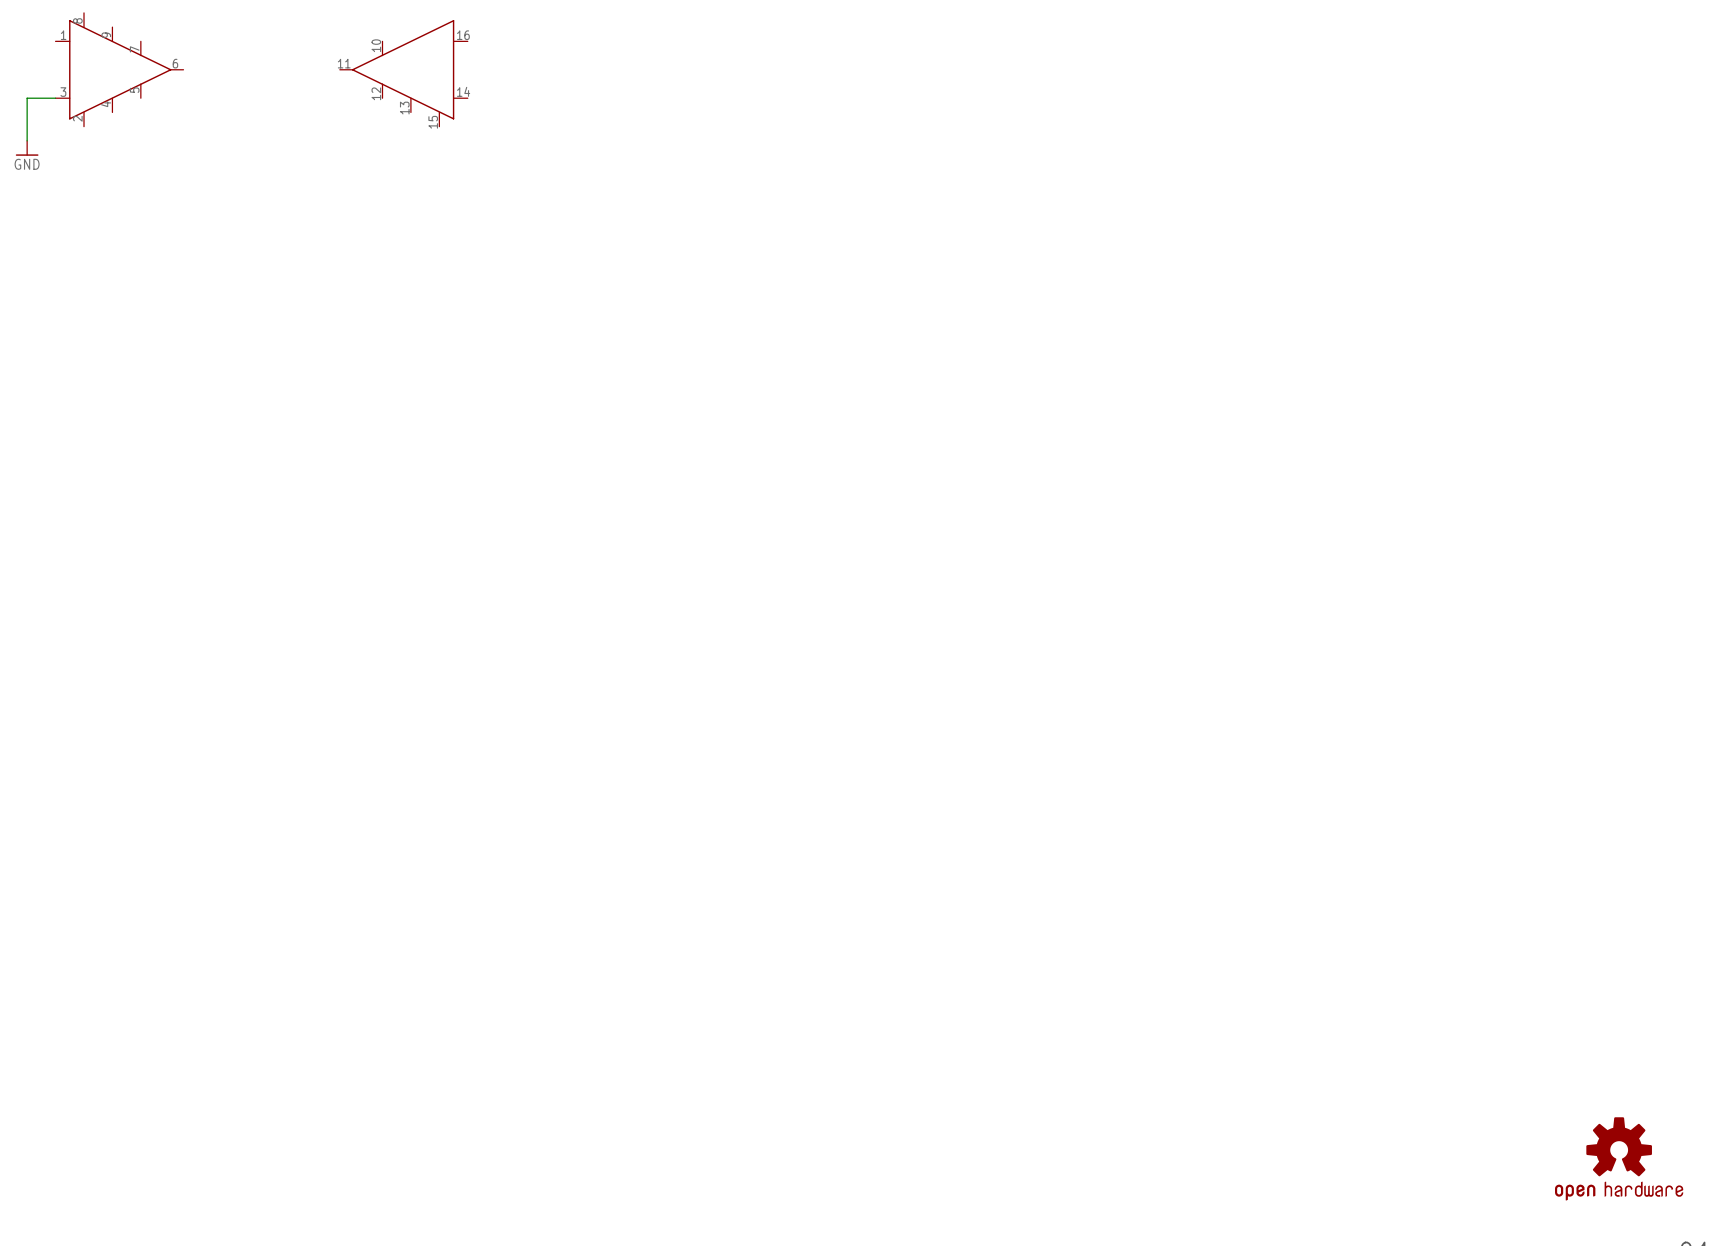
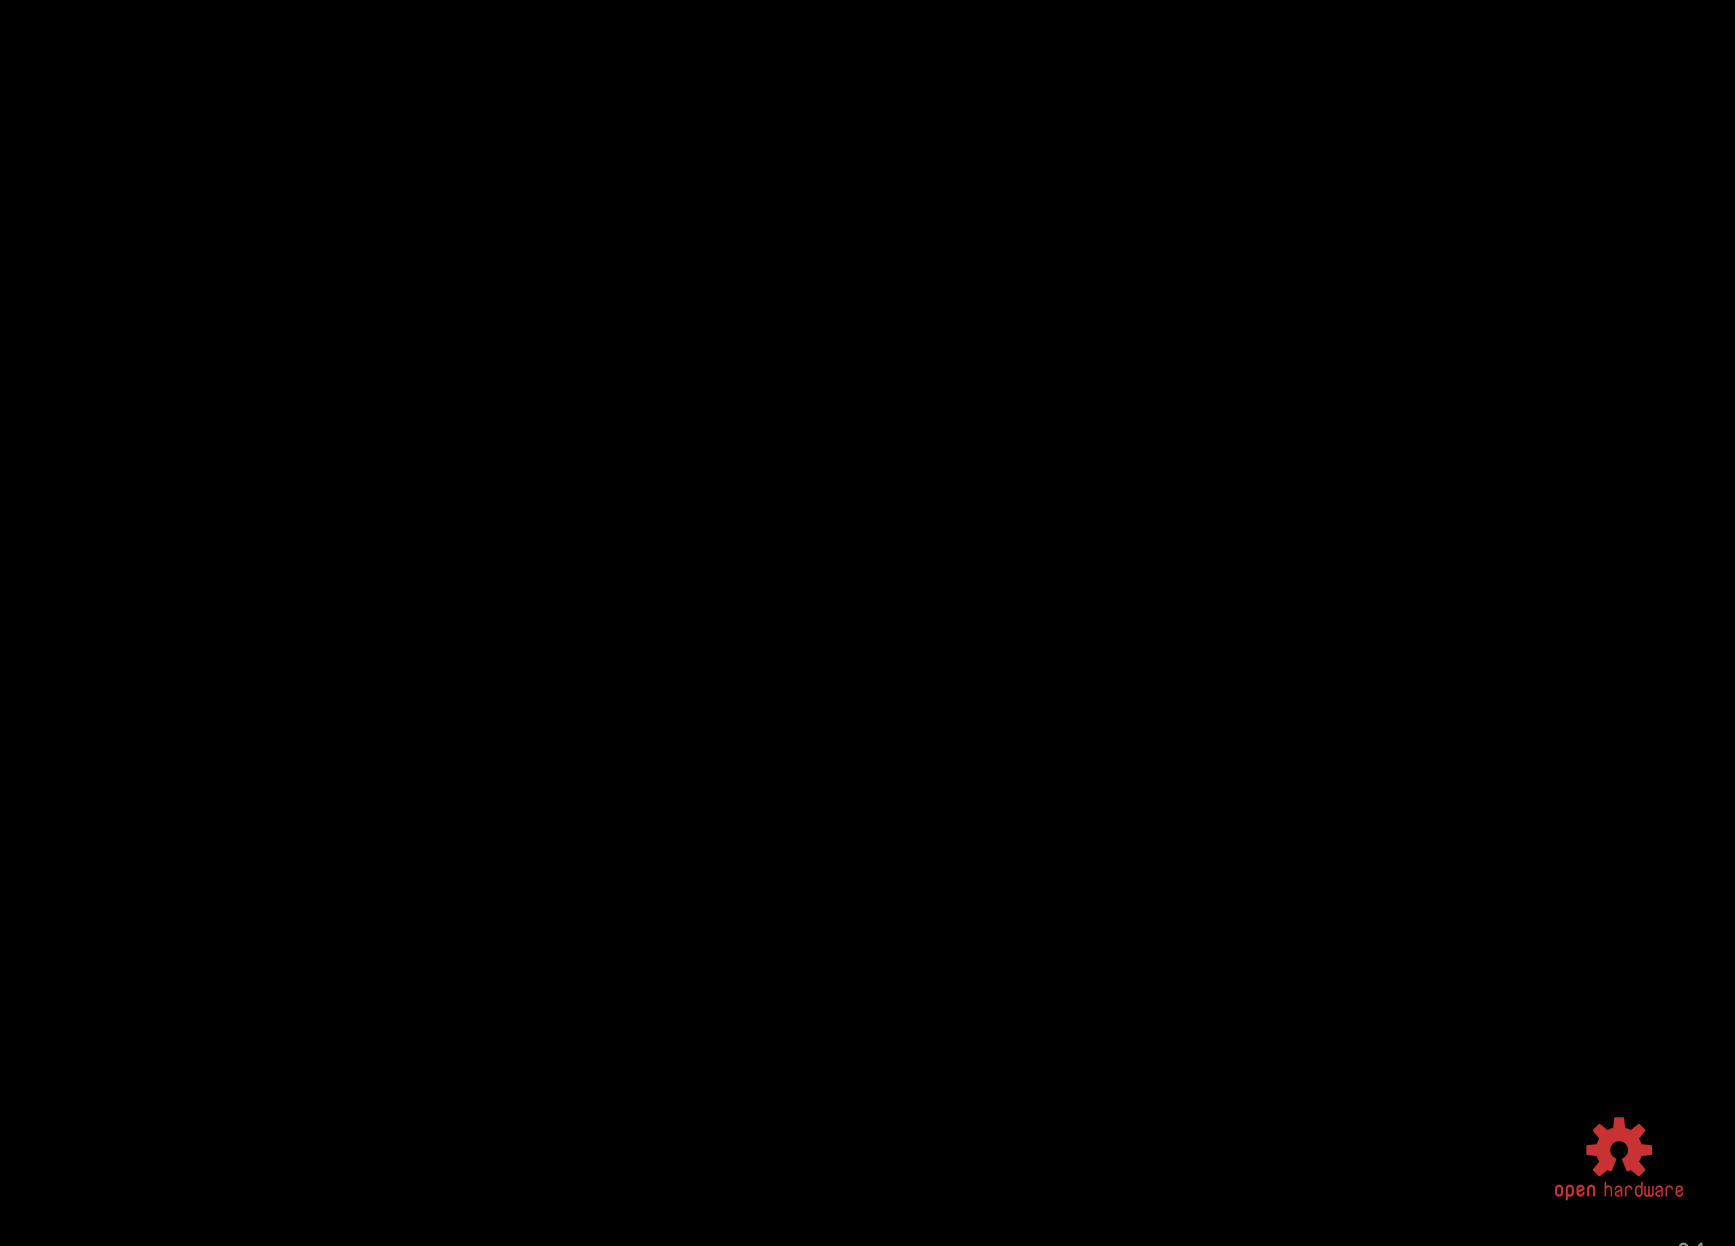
part: (119, 69) -> none
part: (403, 73) -> none
wire: (55, 98) (27, 98) (27, 140) -> none
power symbol: GND (27, 148) -> none

